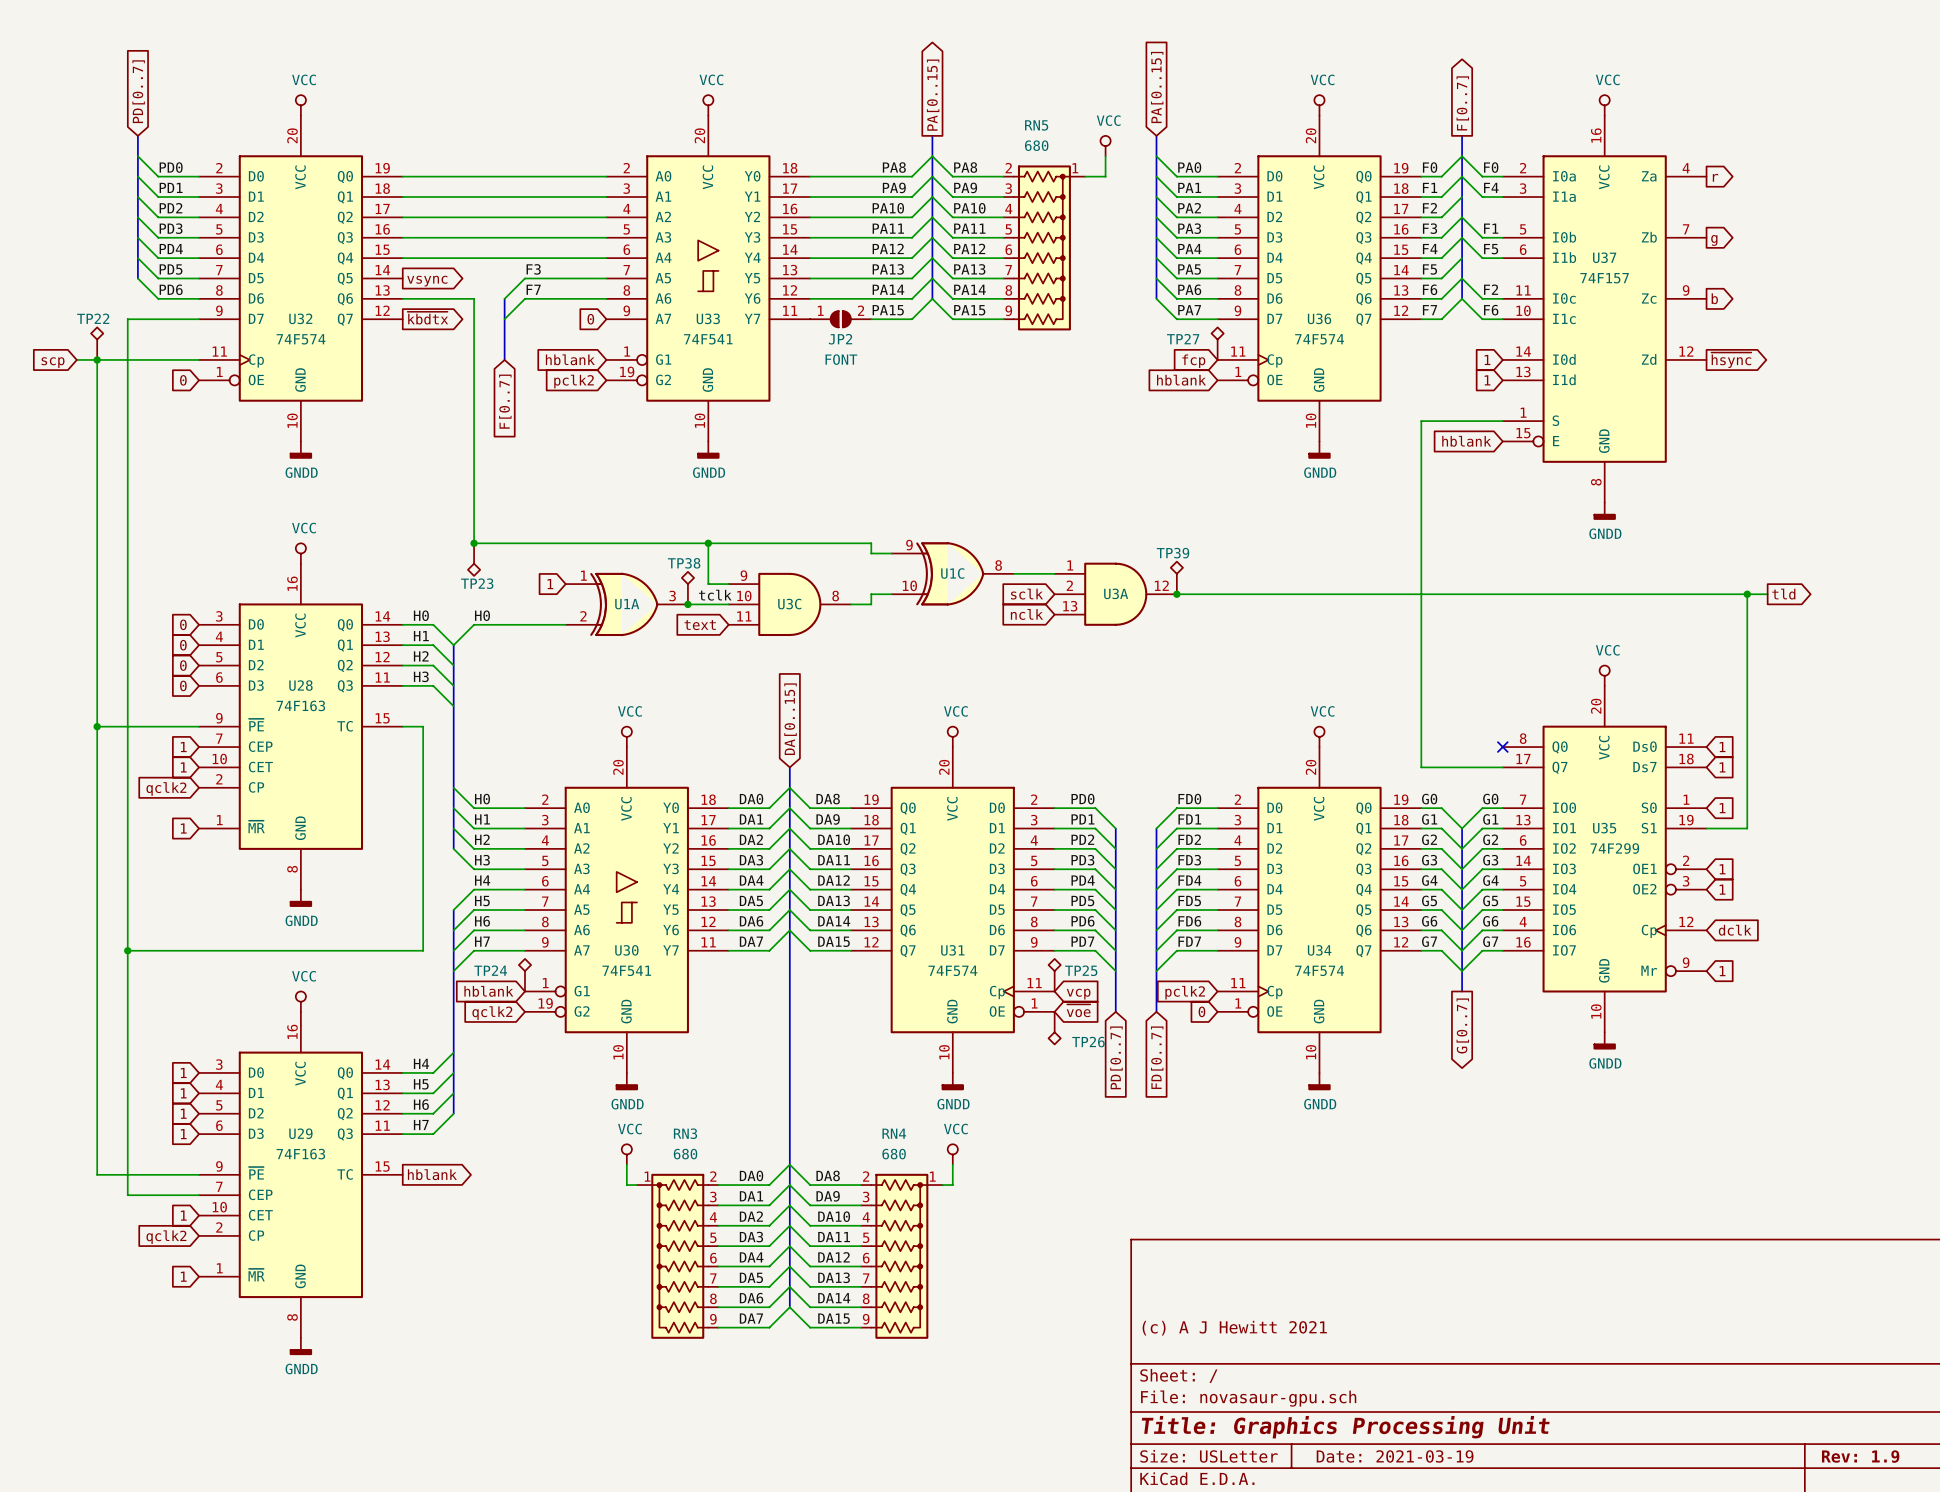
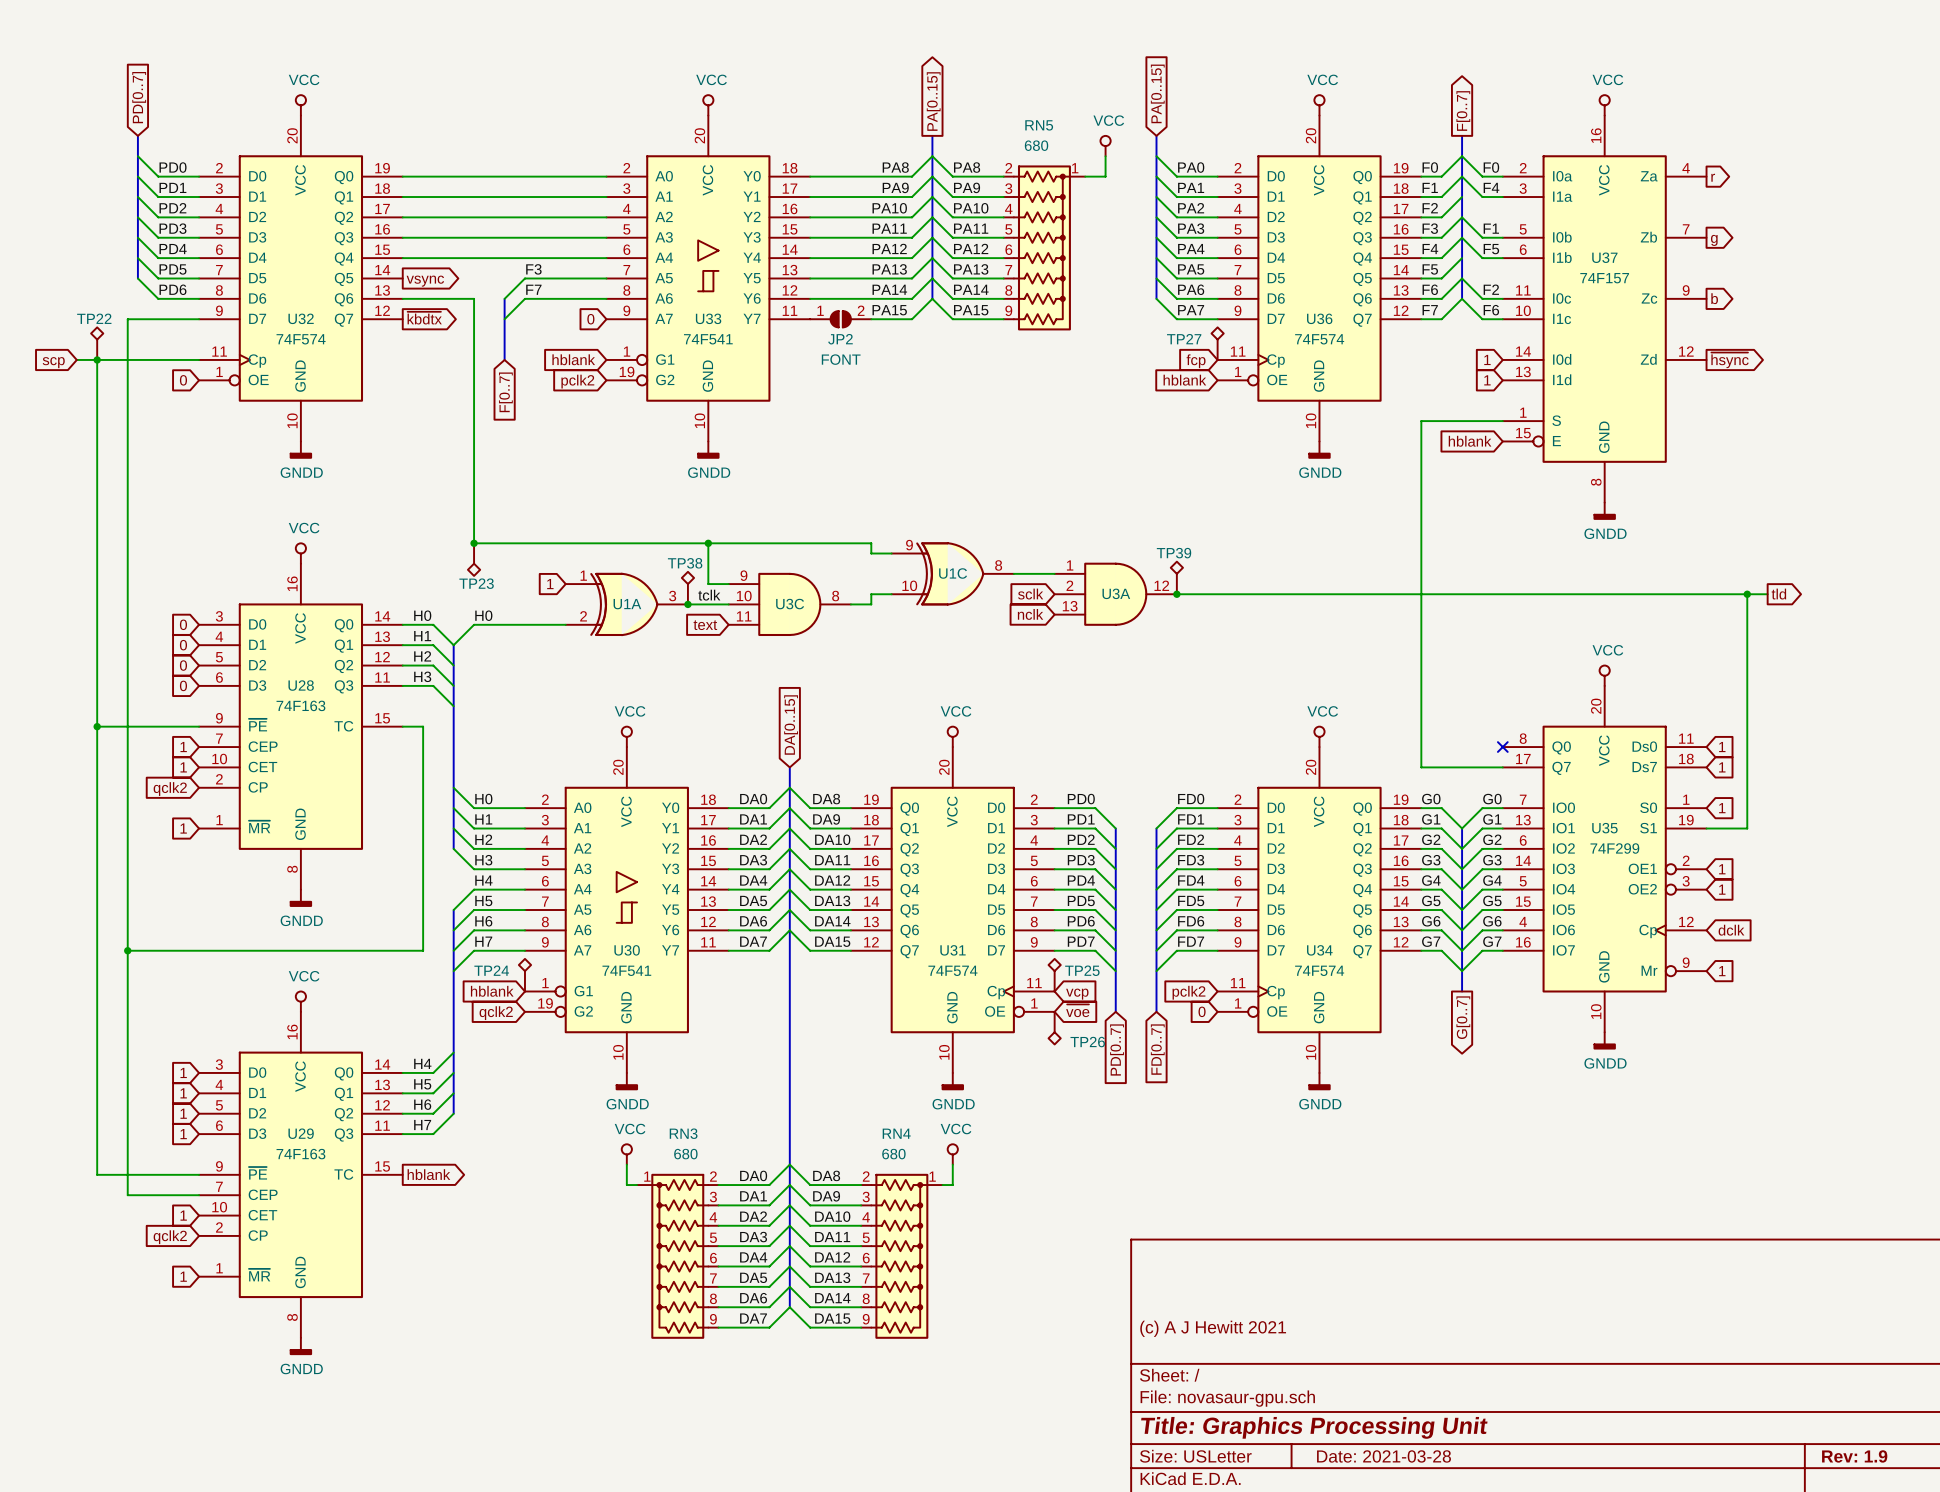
title block: Date: 2021-03-19 (1395, 1456) -> Date: 2021-03-28 (1384, 1456)

